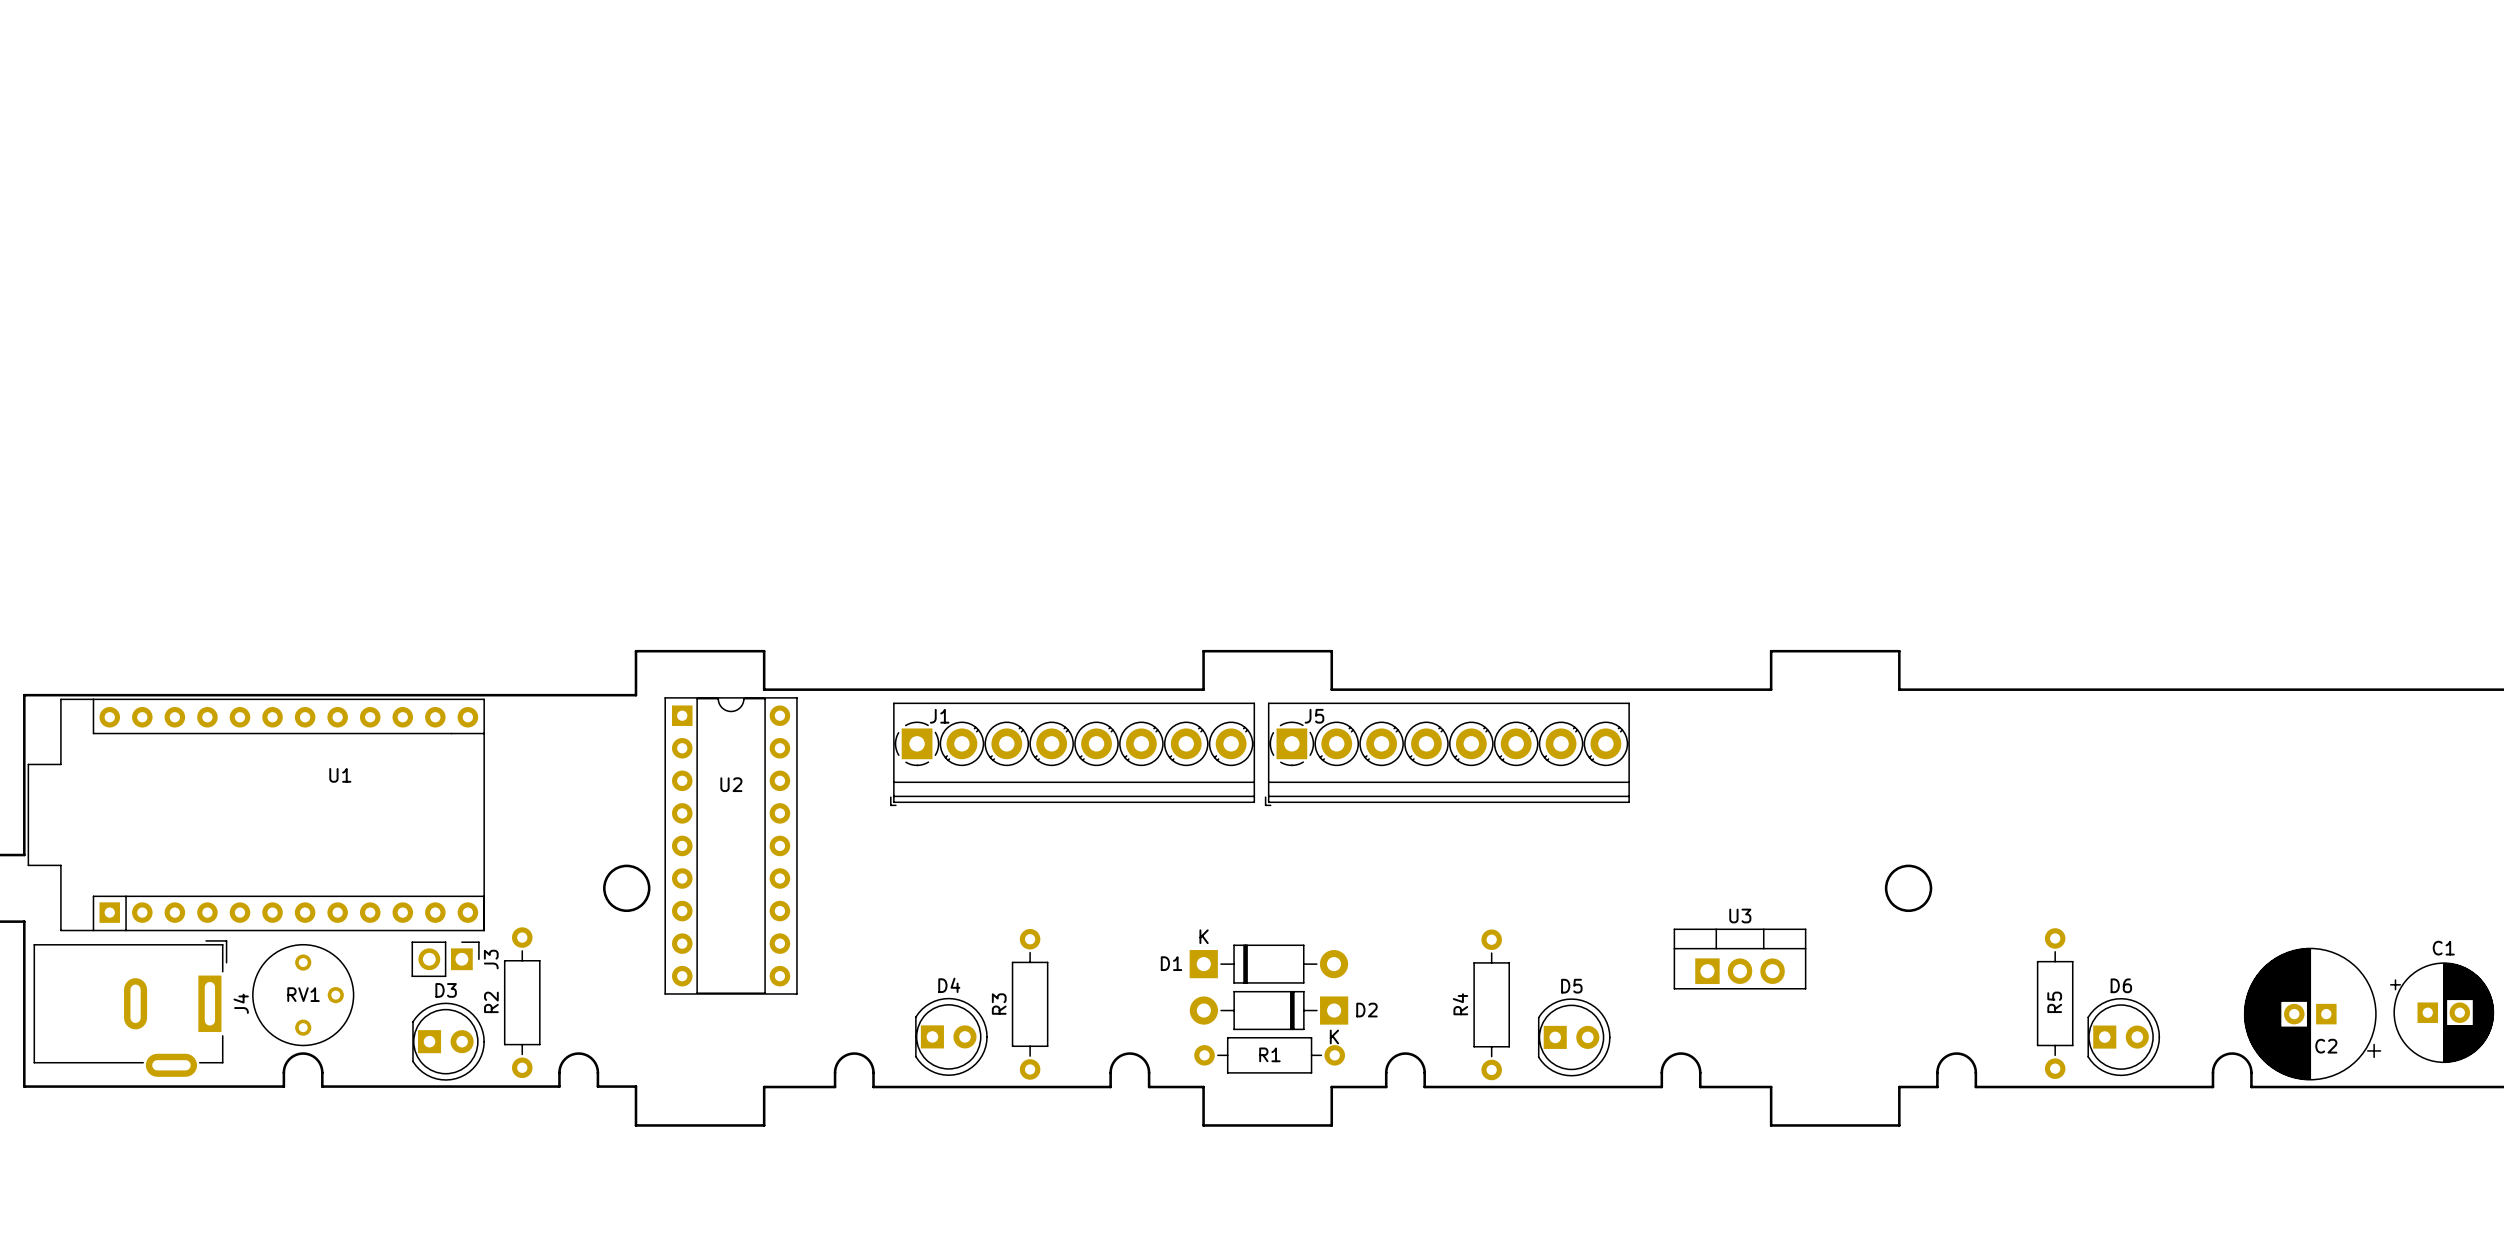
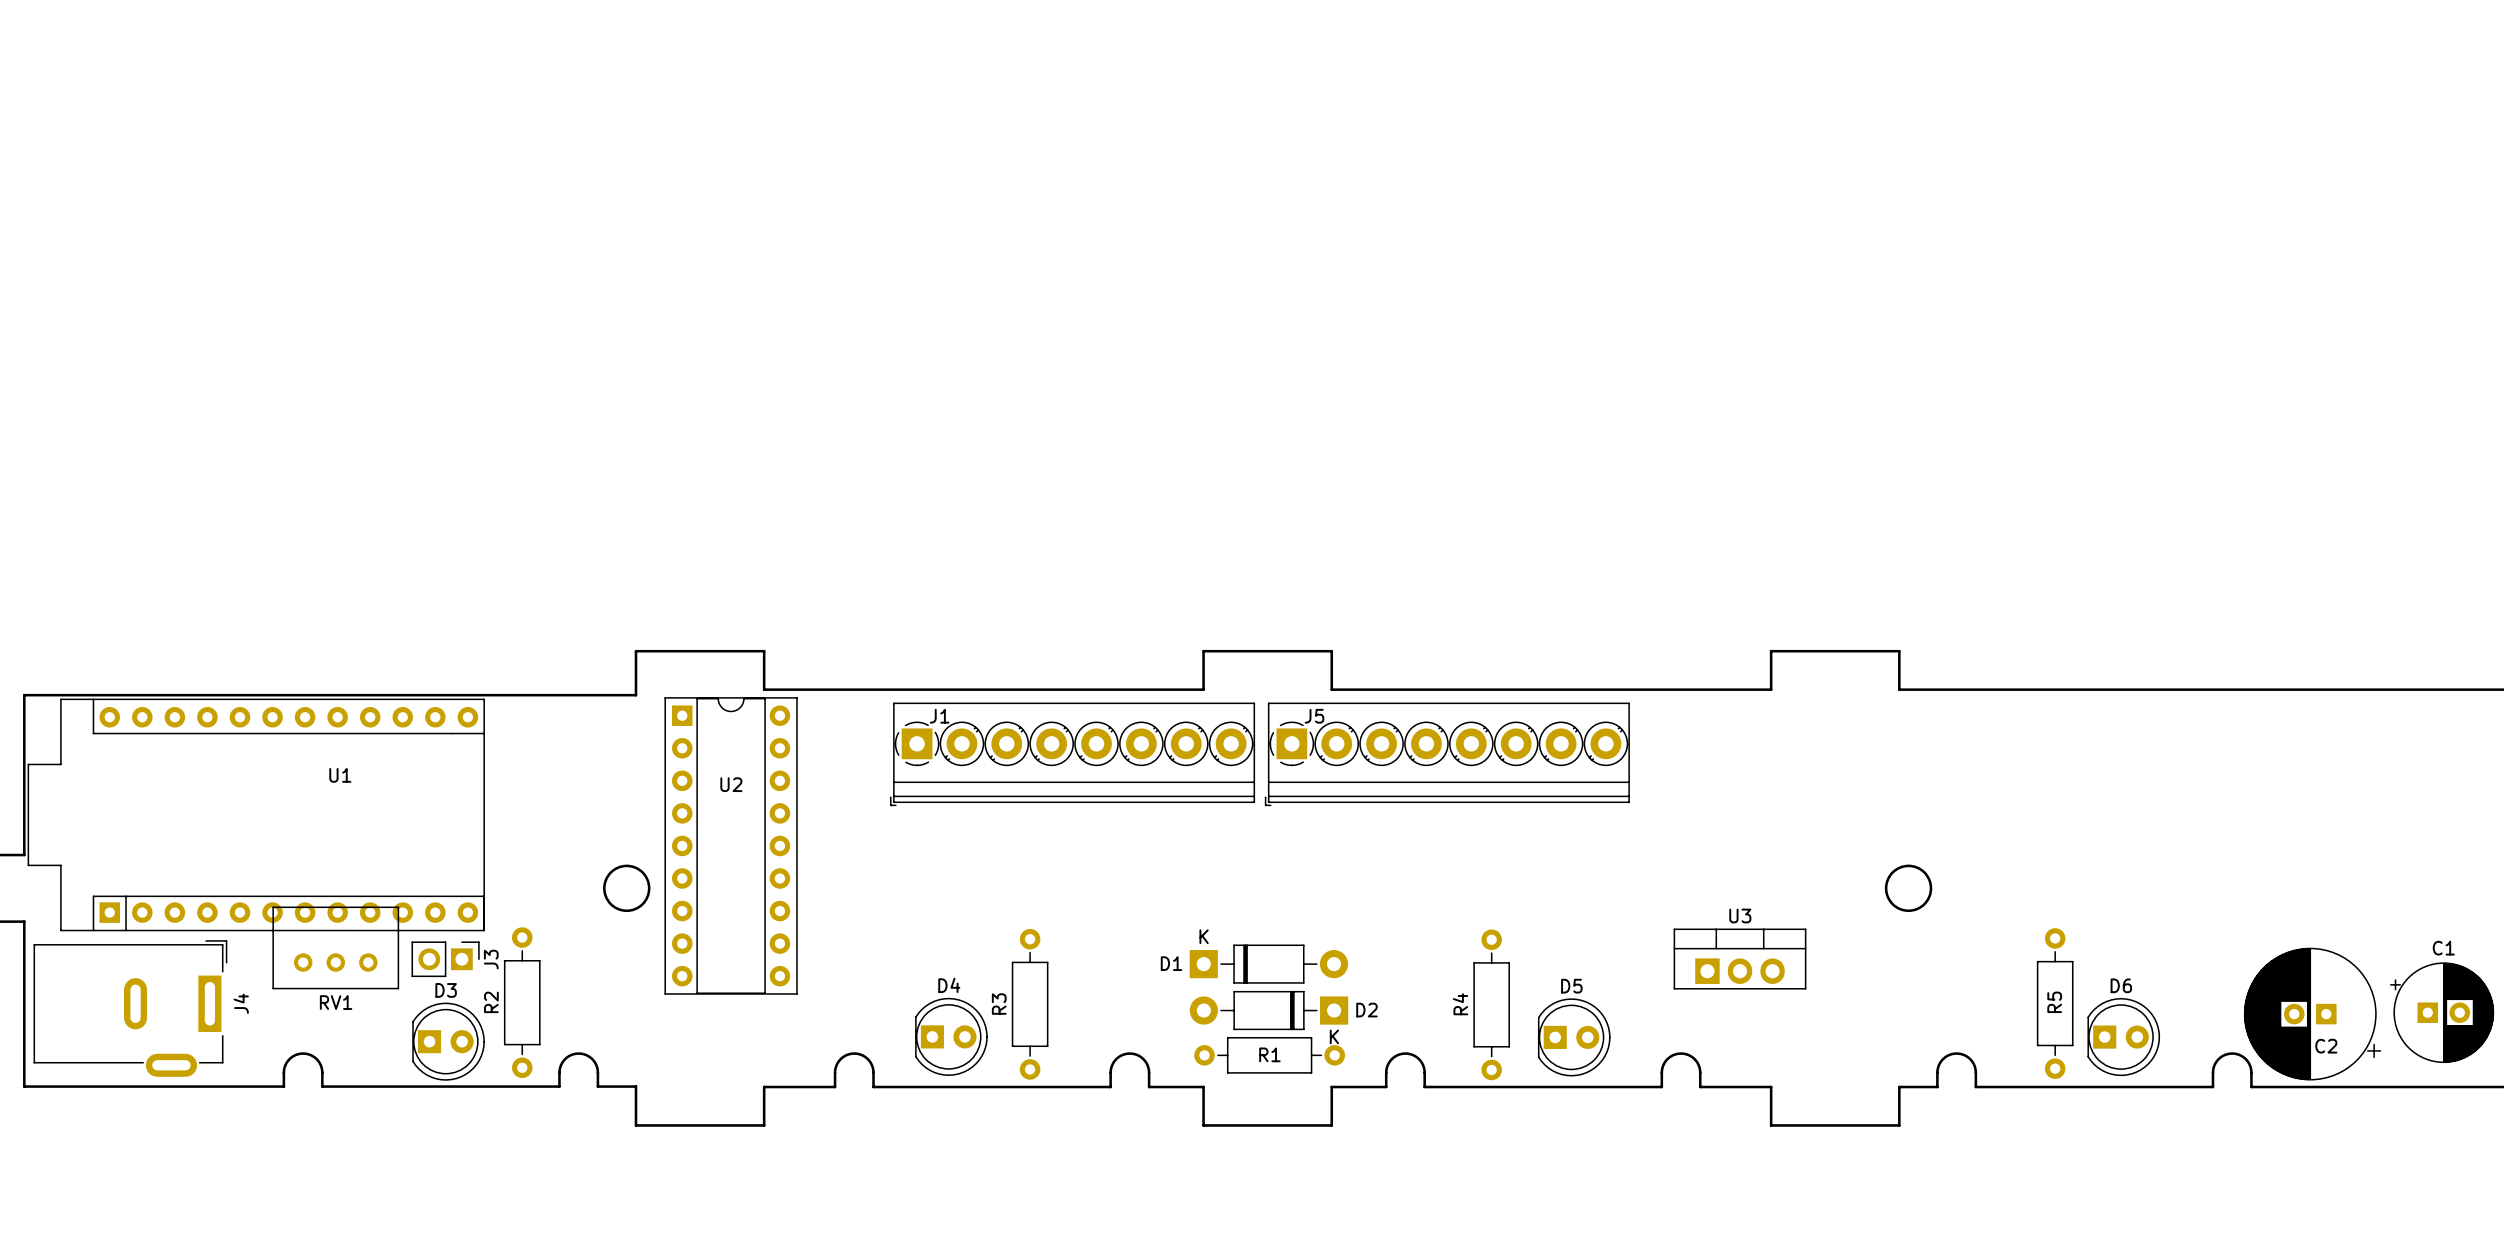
RV1 footprint: [252, 943, 355, 1047] -> [272, 906, 400, 990]
RV1 name position: RV1 (303, 994) -> RV1 (336, 1002)

